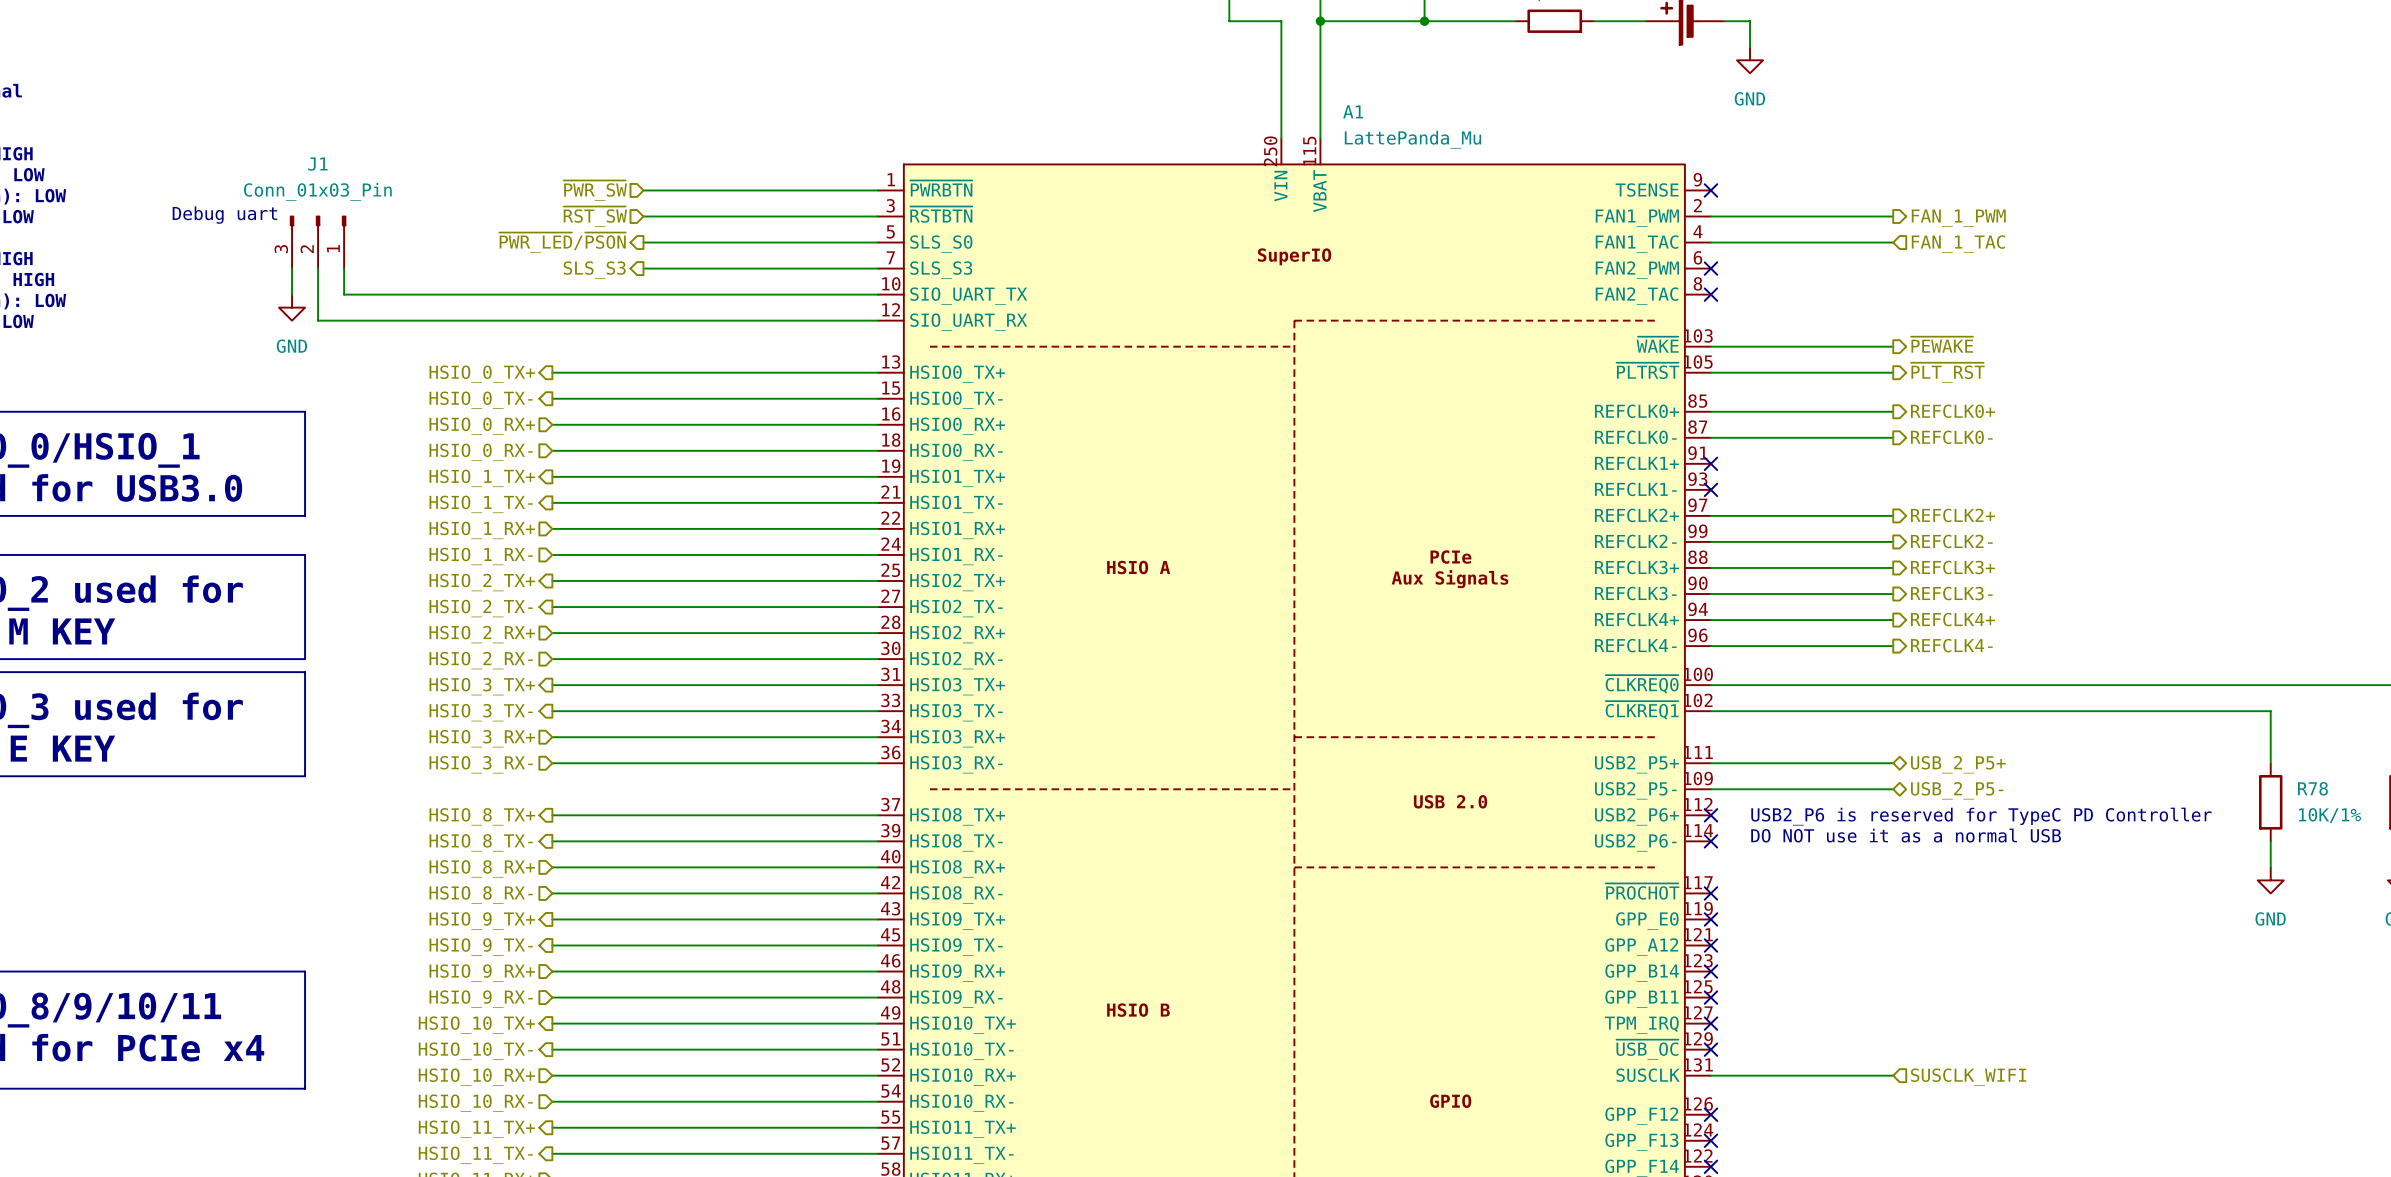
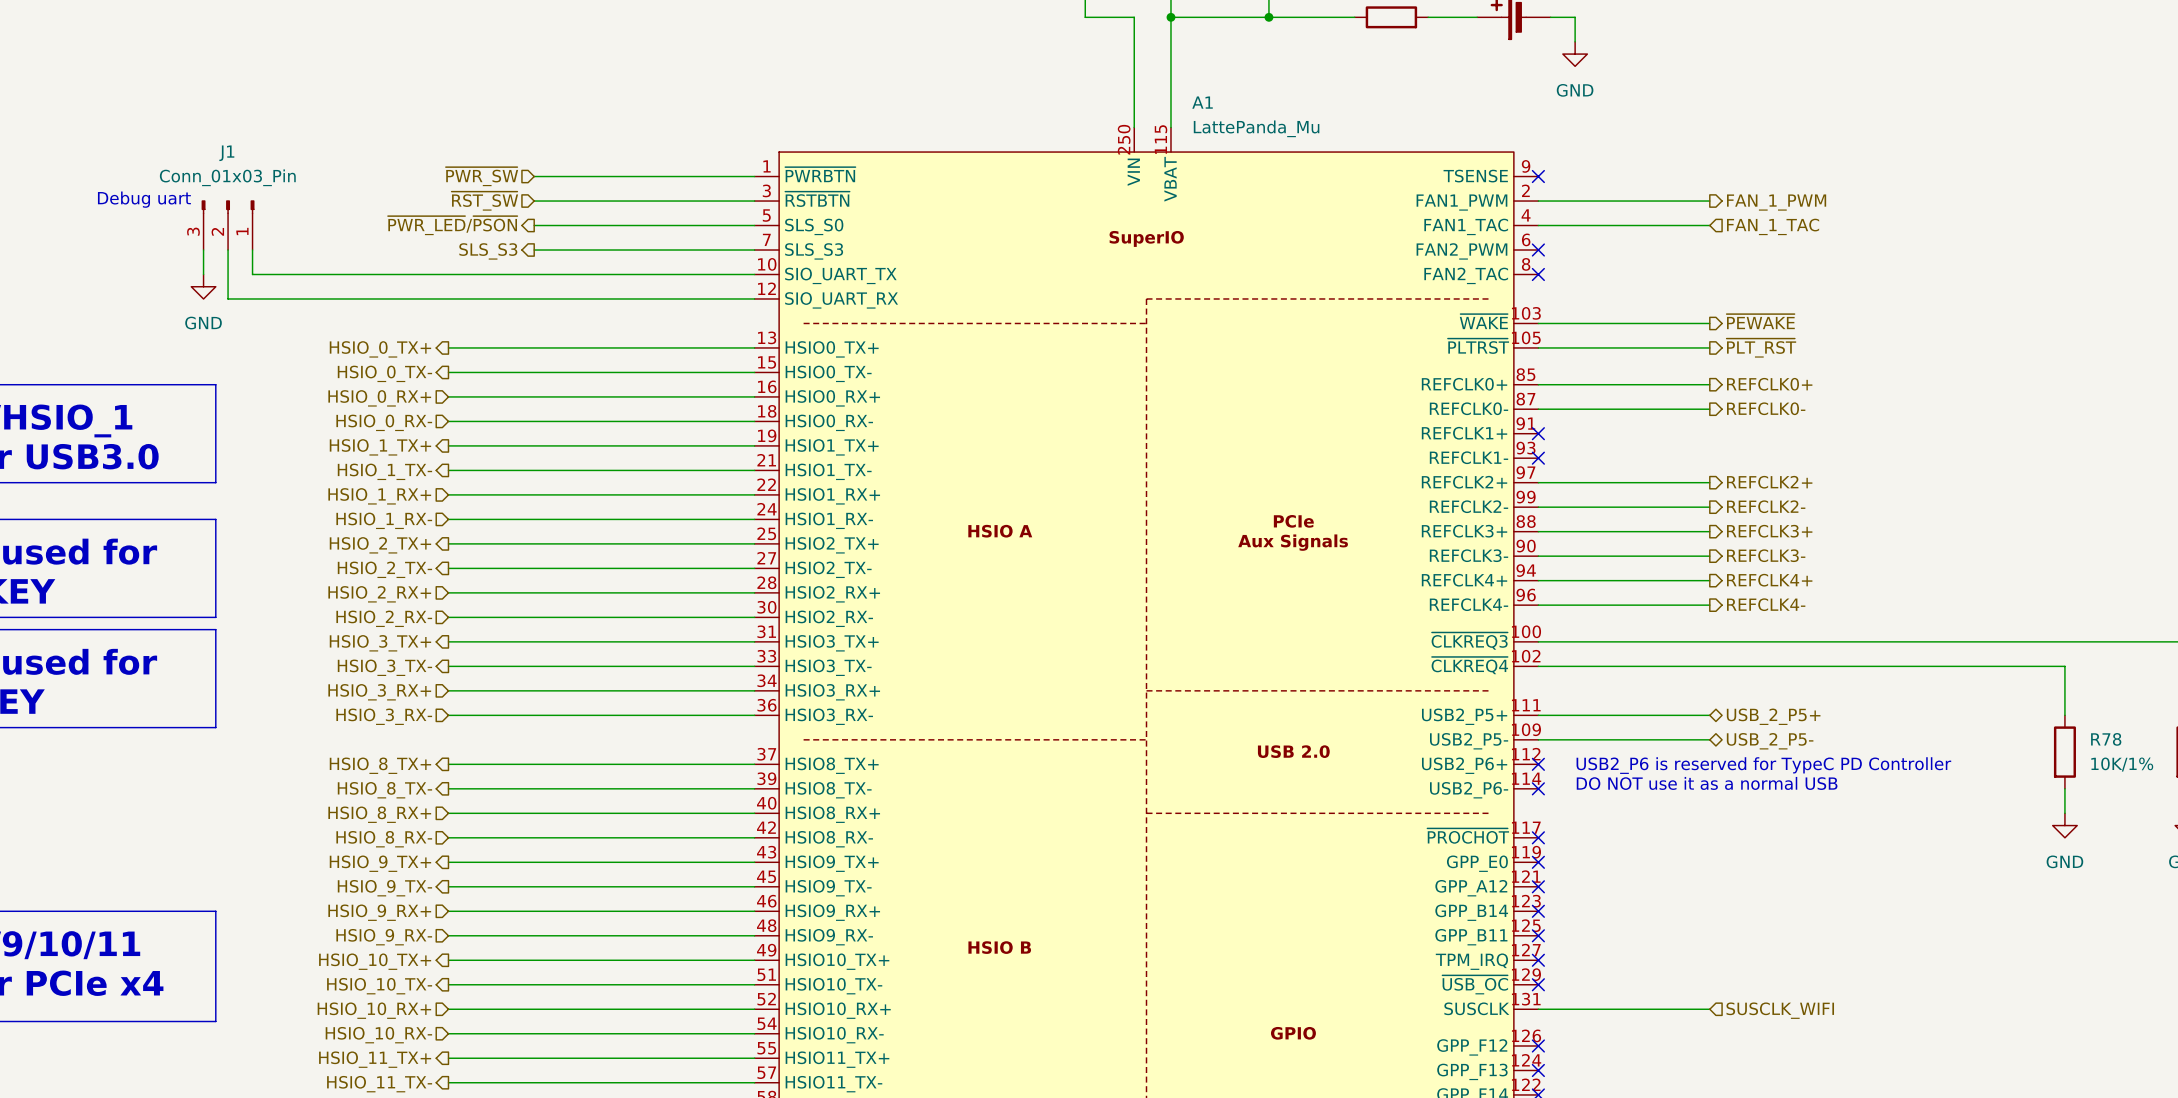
A1 pin name: ~{CLKREQ0} (1642, 684) -> ~{CLKREQ3} (1469, 641)
A1 pin name: ~{CLKREQ1} (1642, 710) -> ~{CLKREQ4} (1469, 665)

